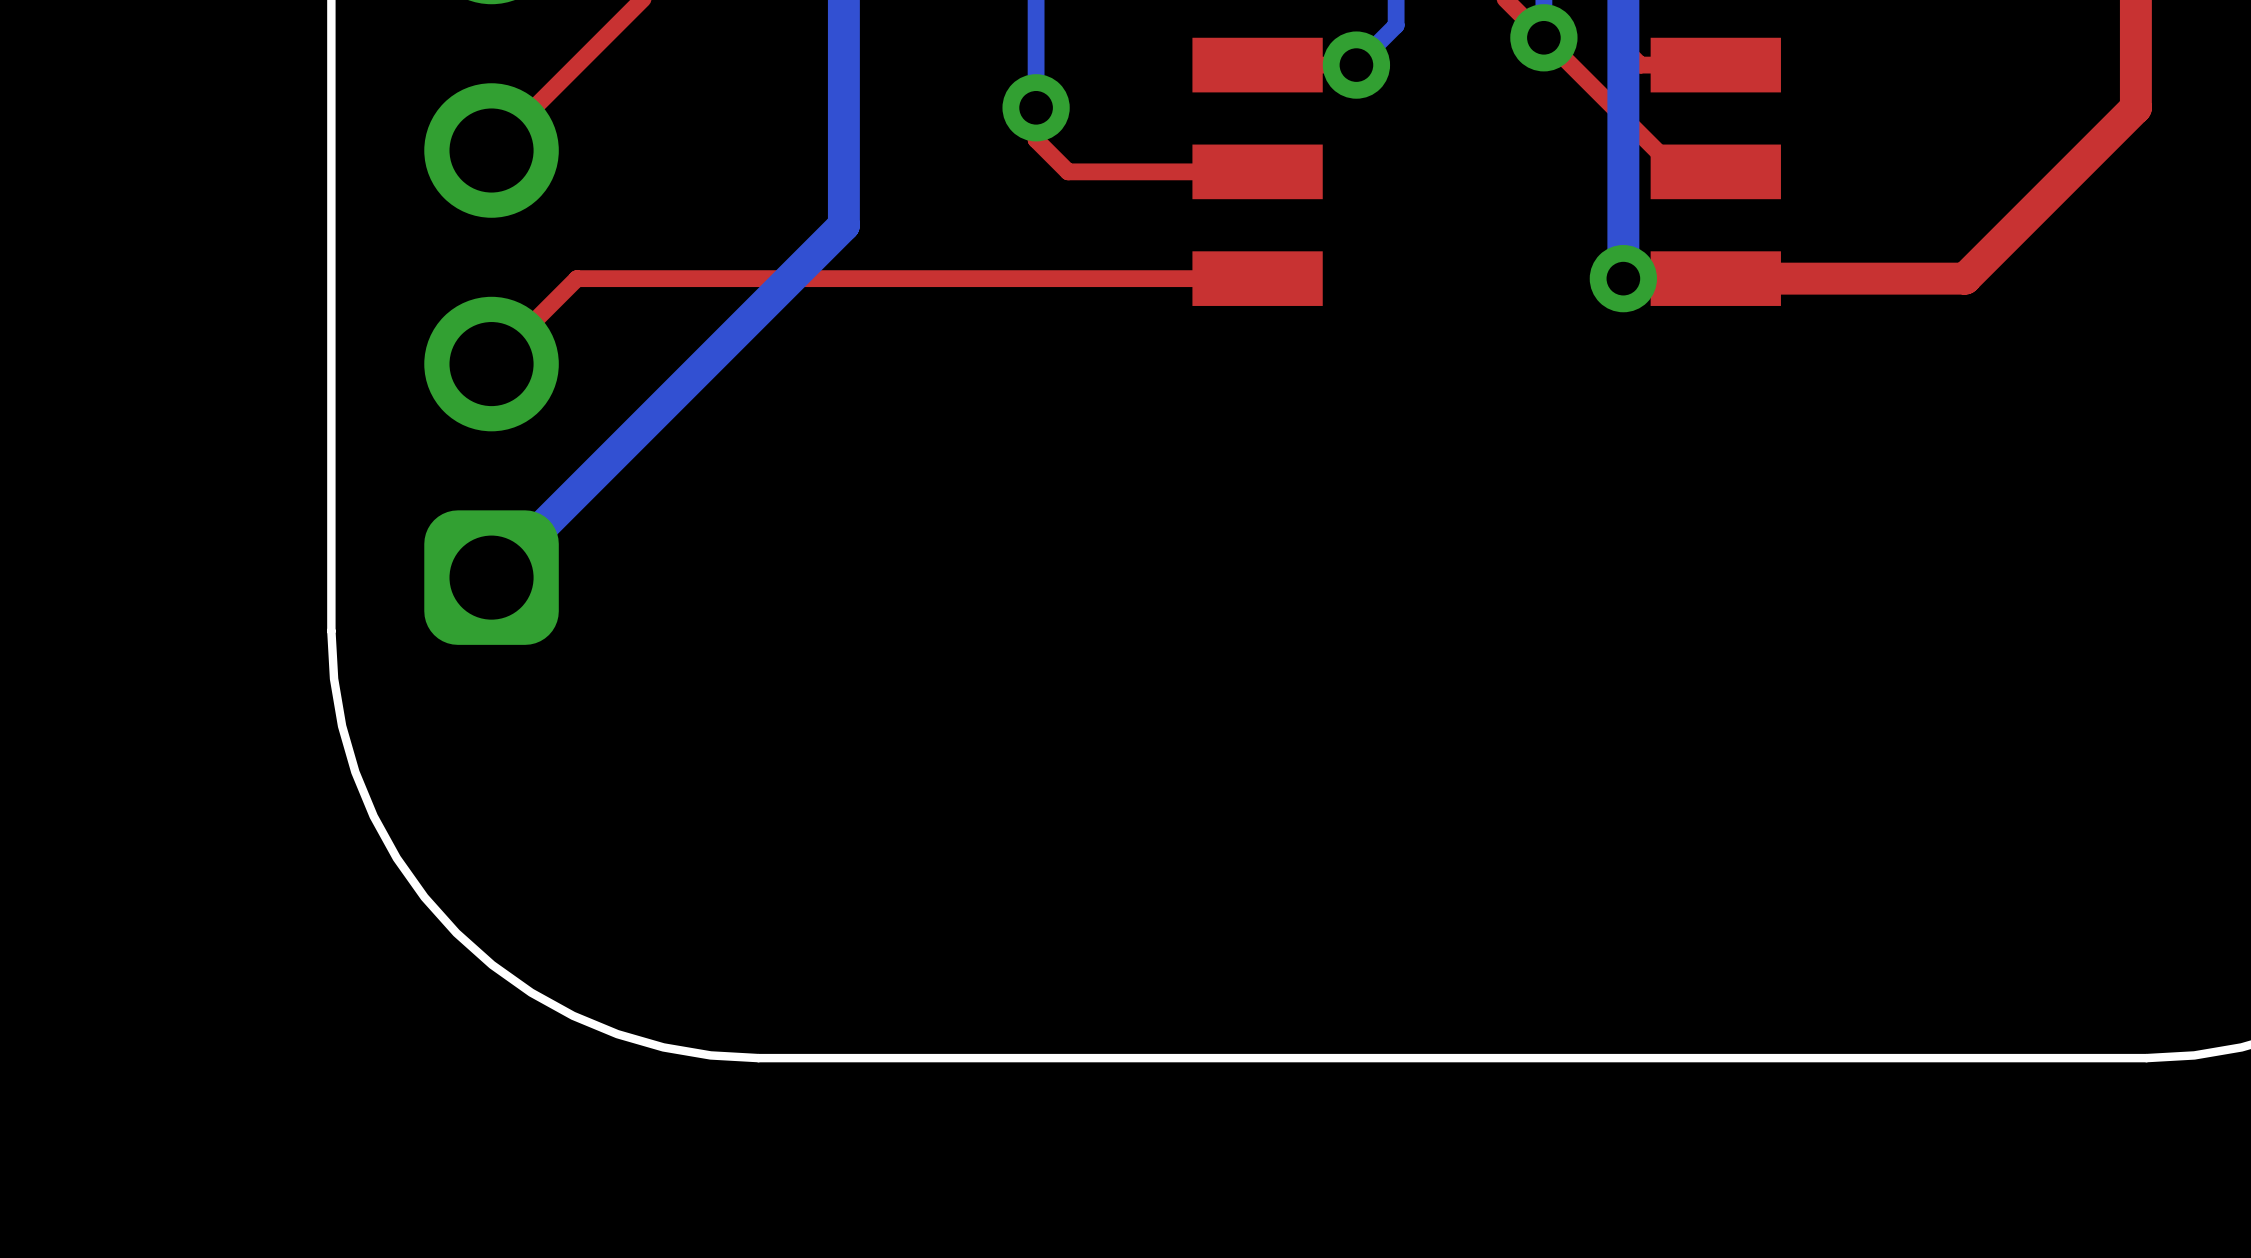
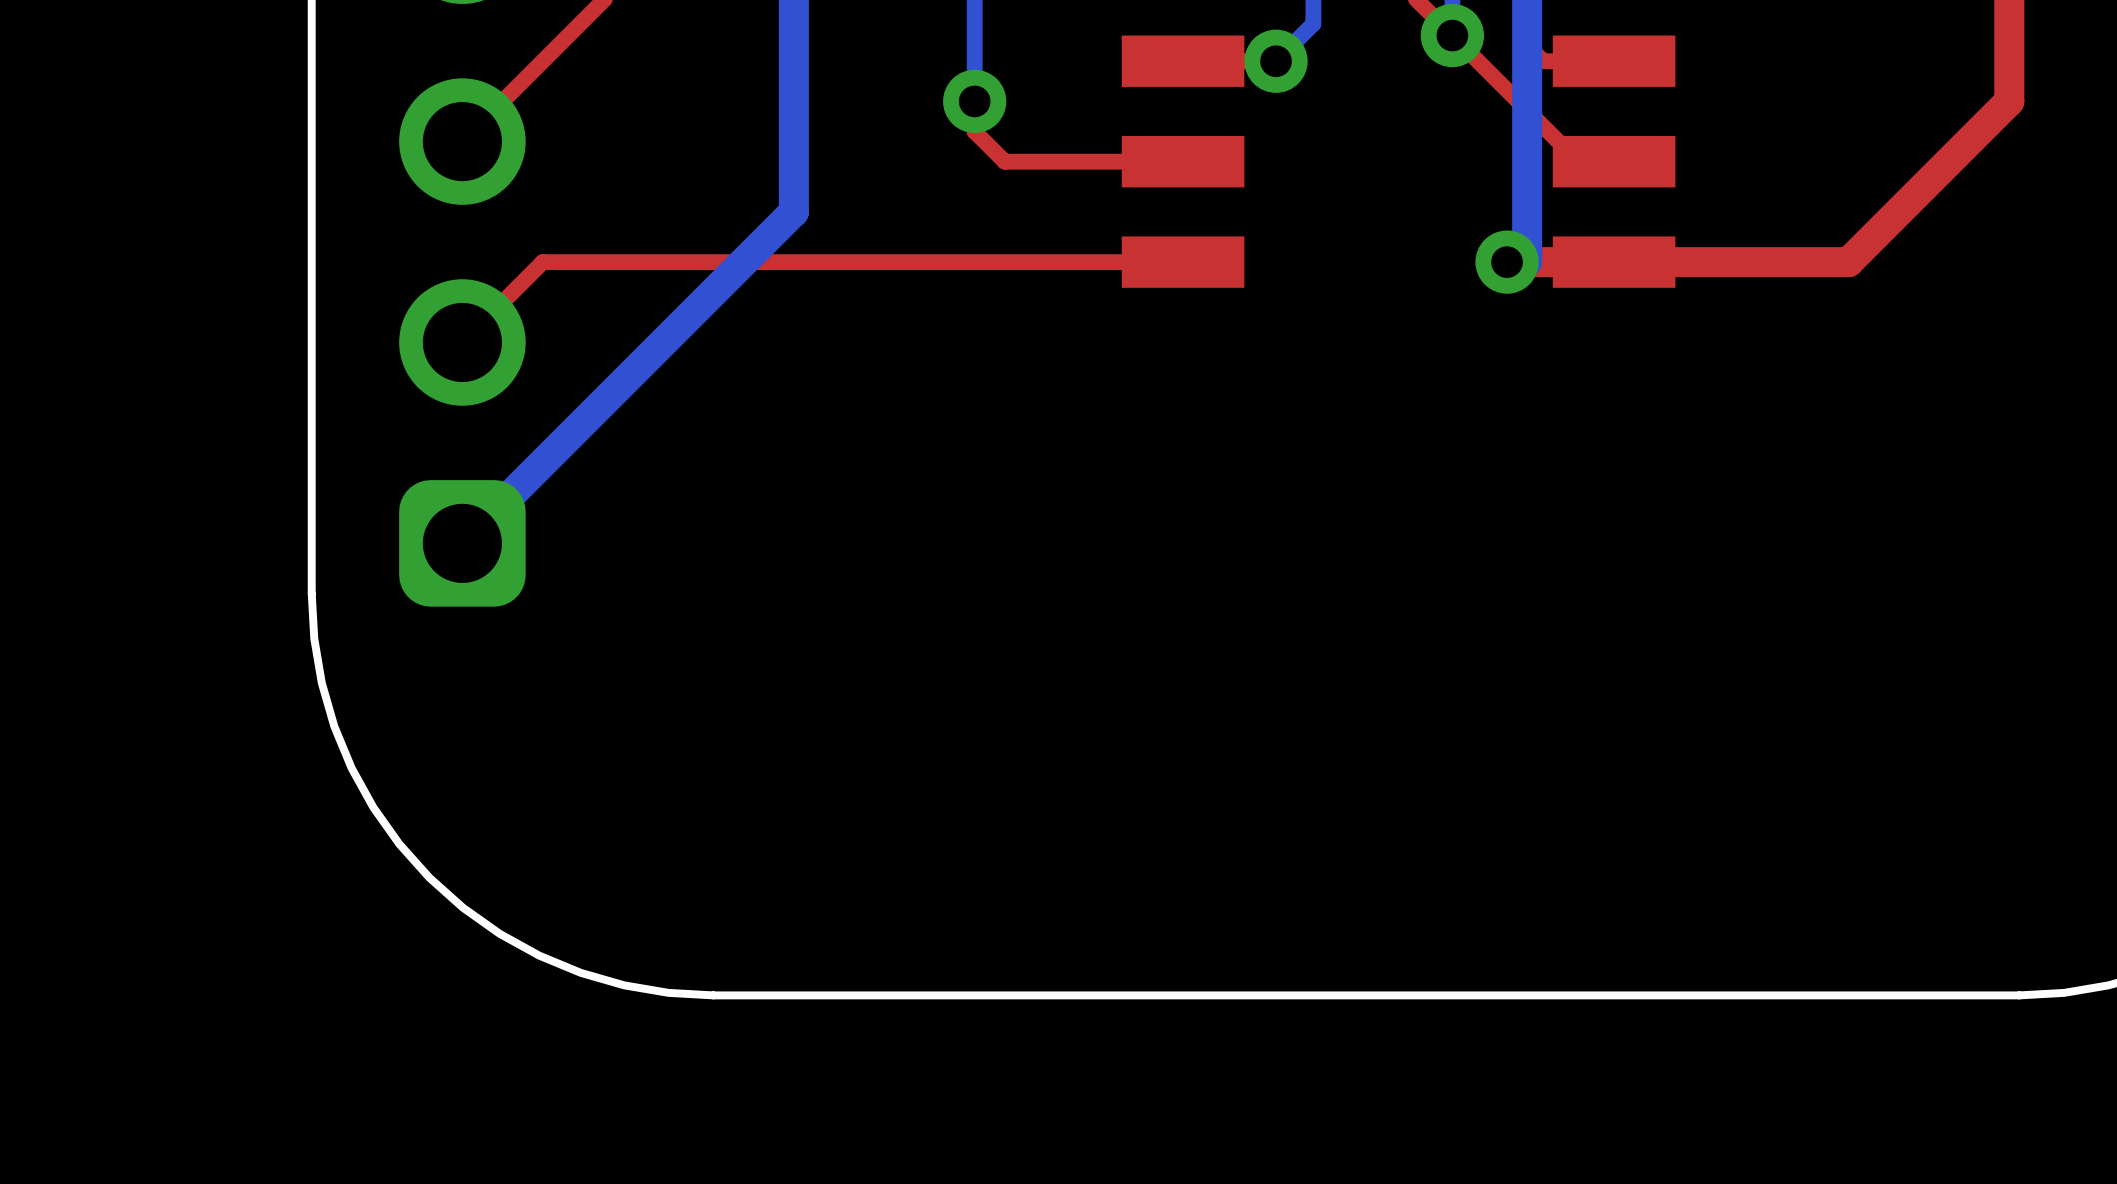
via position: (1623, 278) -> (1507, 262)

